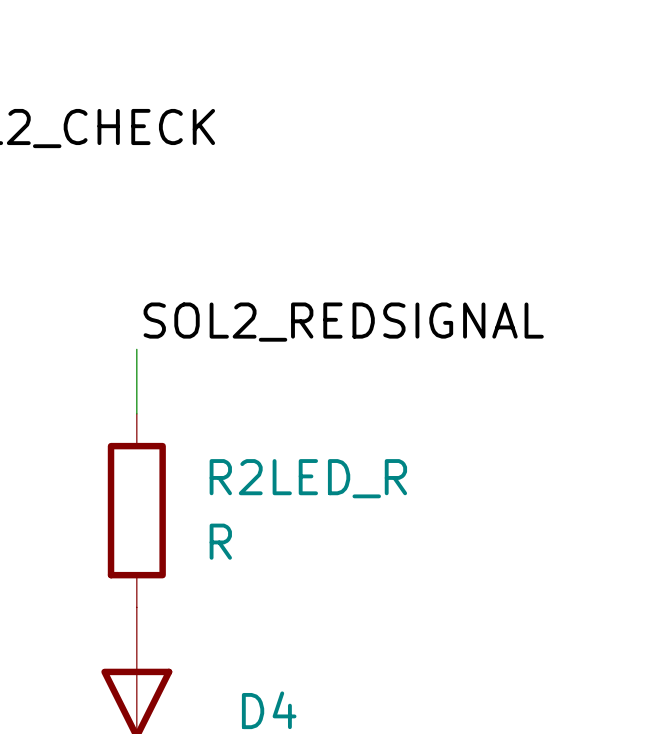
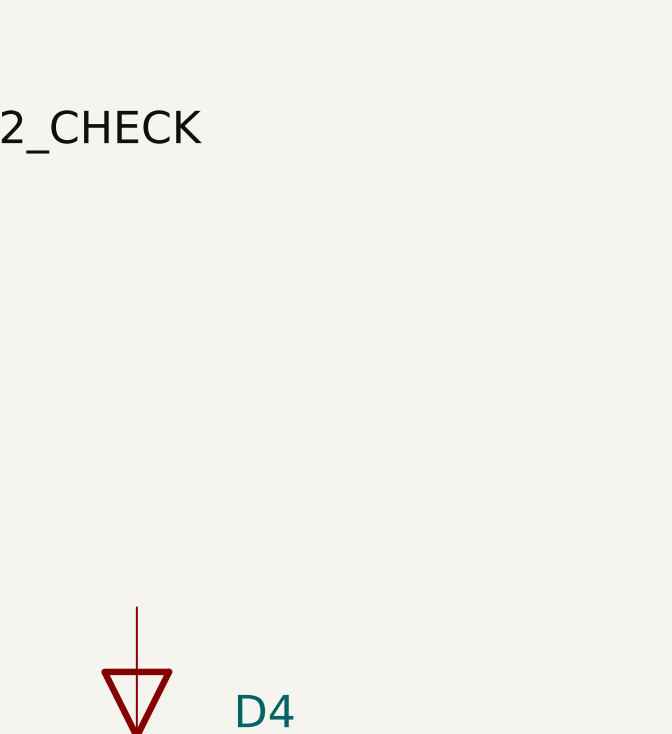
label: SOL2_REDSIGNAL (343, 322) -> none
wire: (136, 349) (136, 413) -> none
R2LED_R: R (136, 510) -> none

